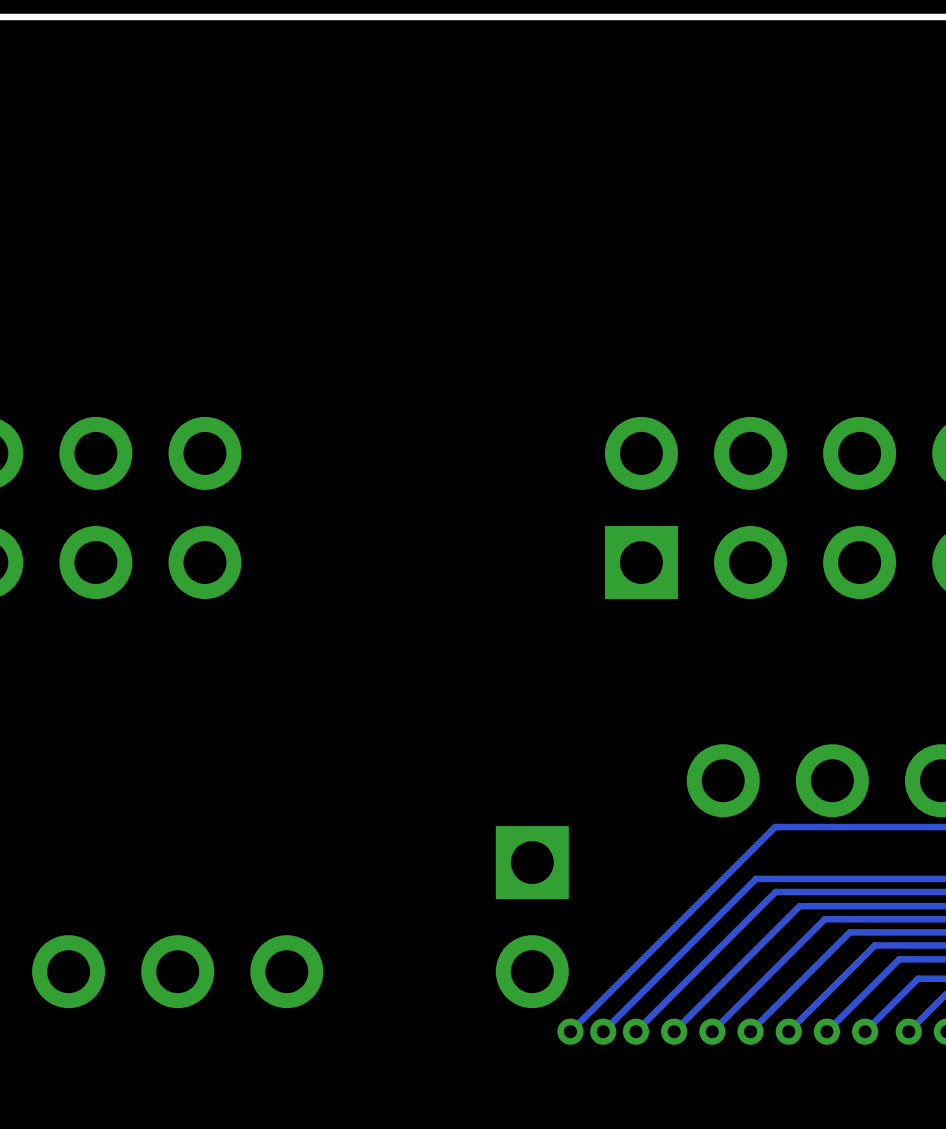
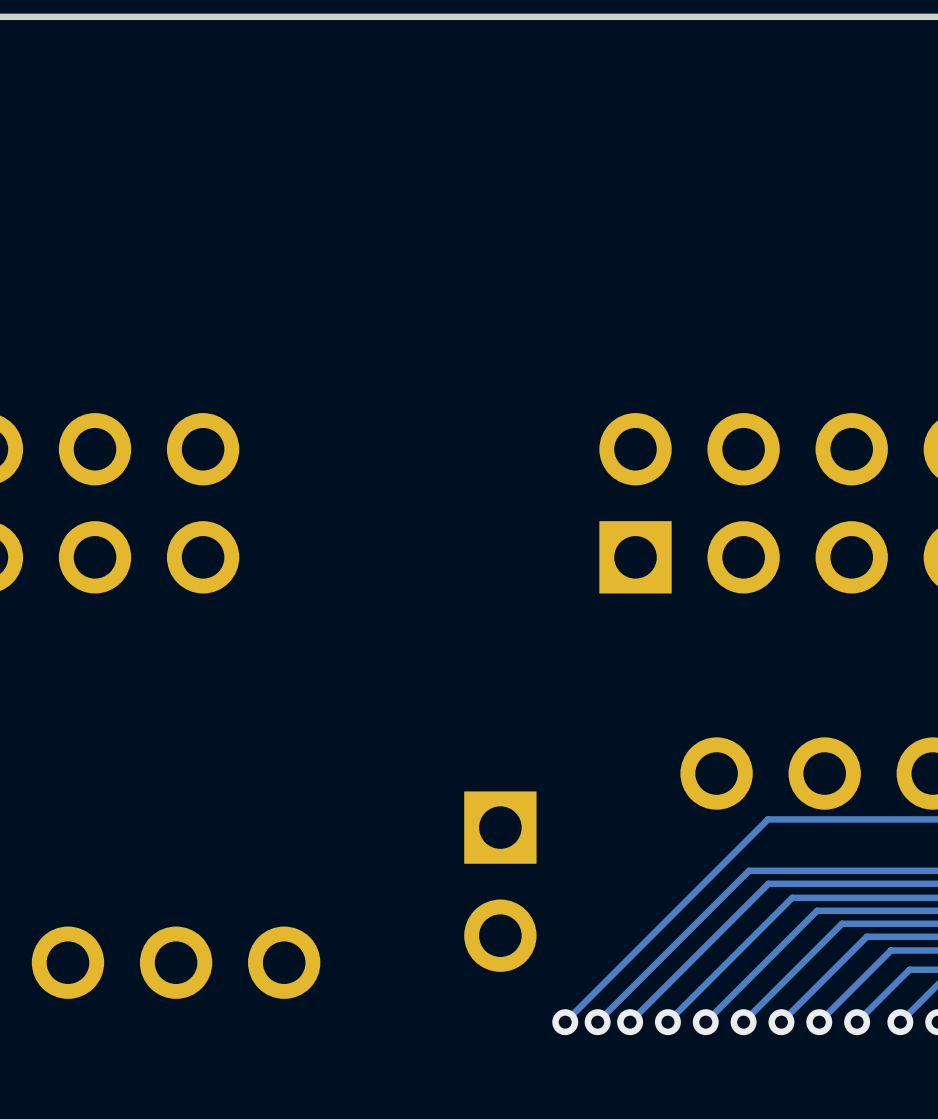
part position: (532, 917) -> (500, 881)

